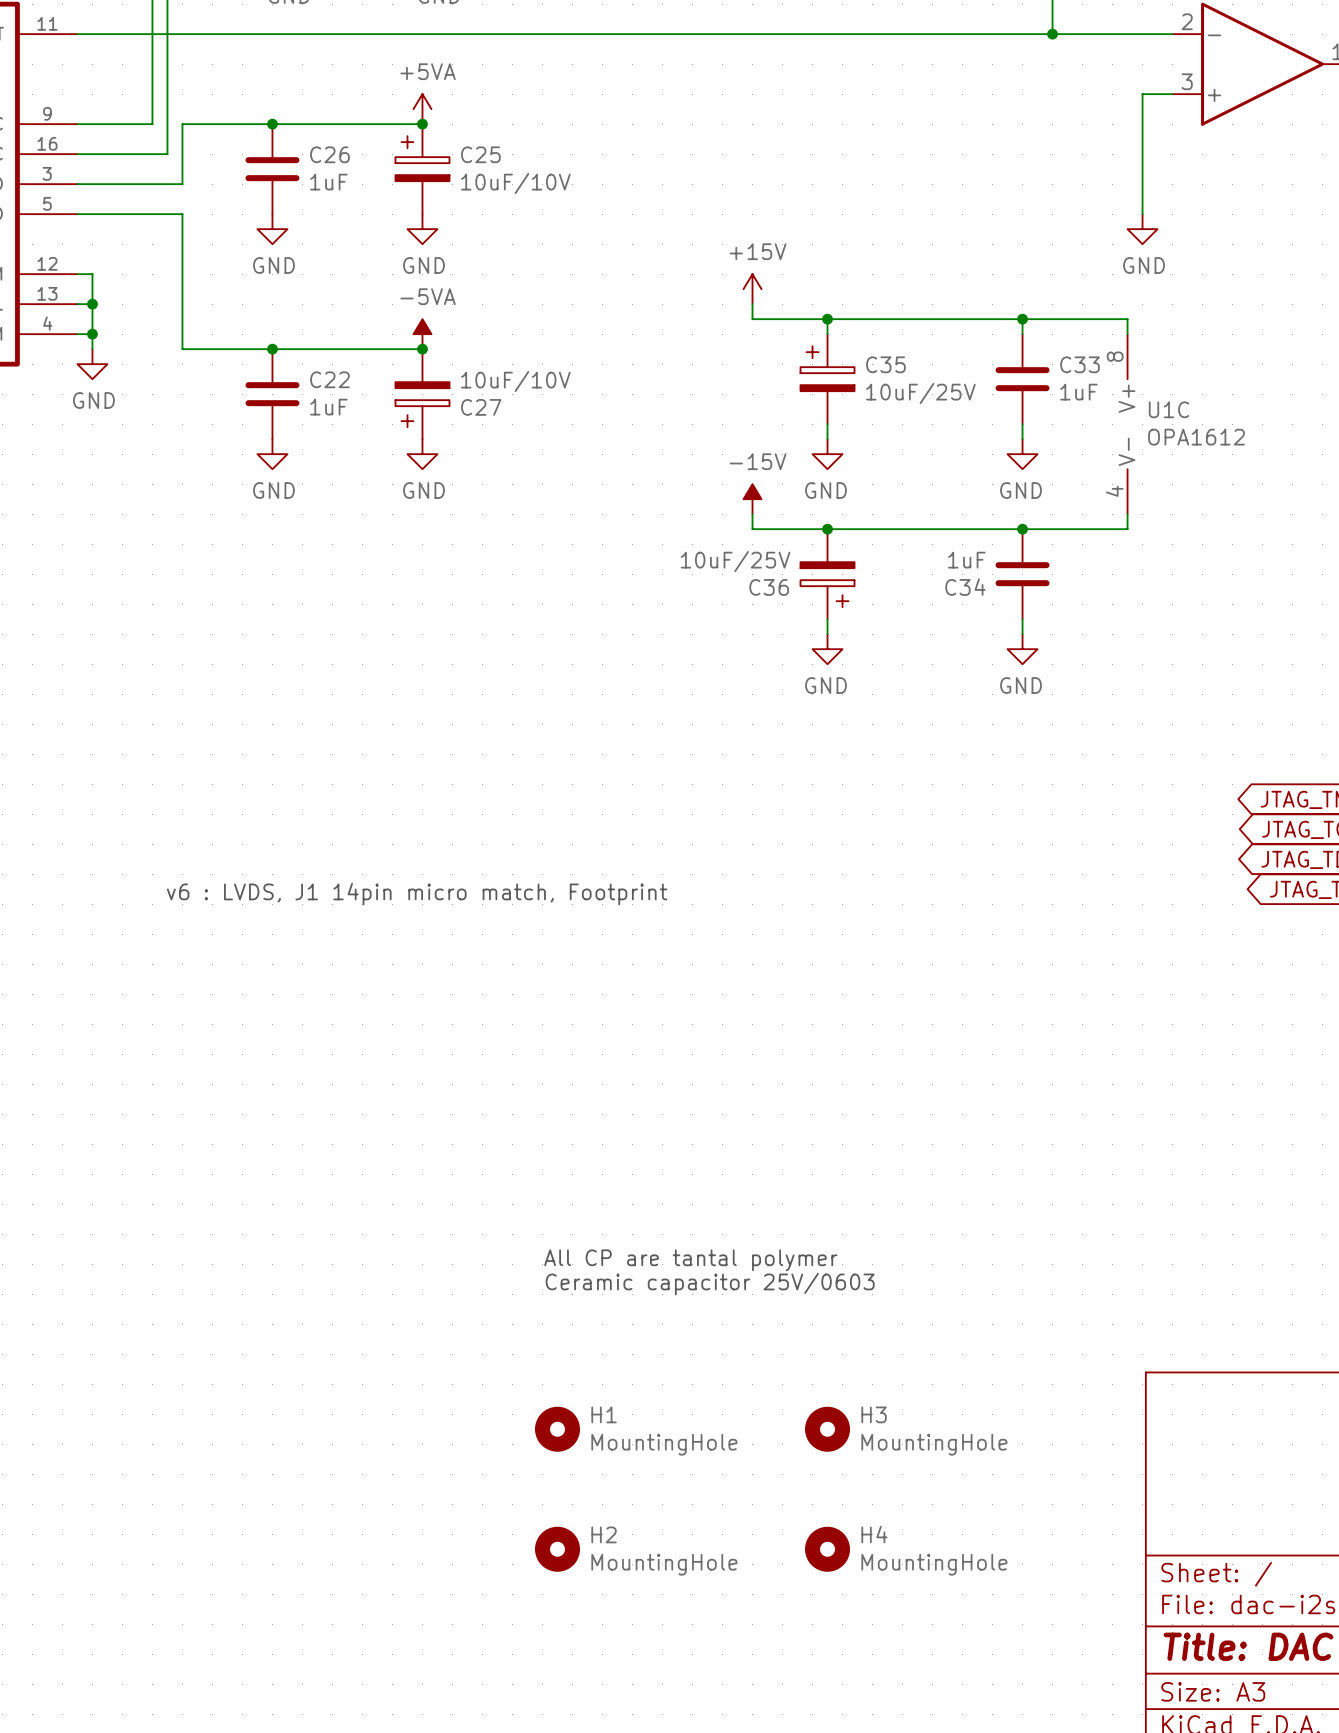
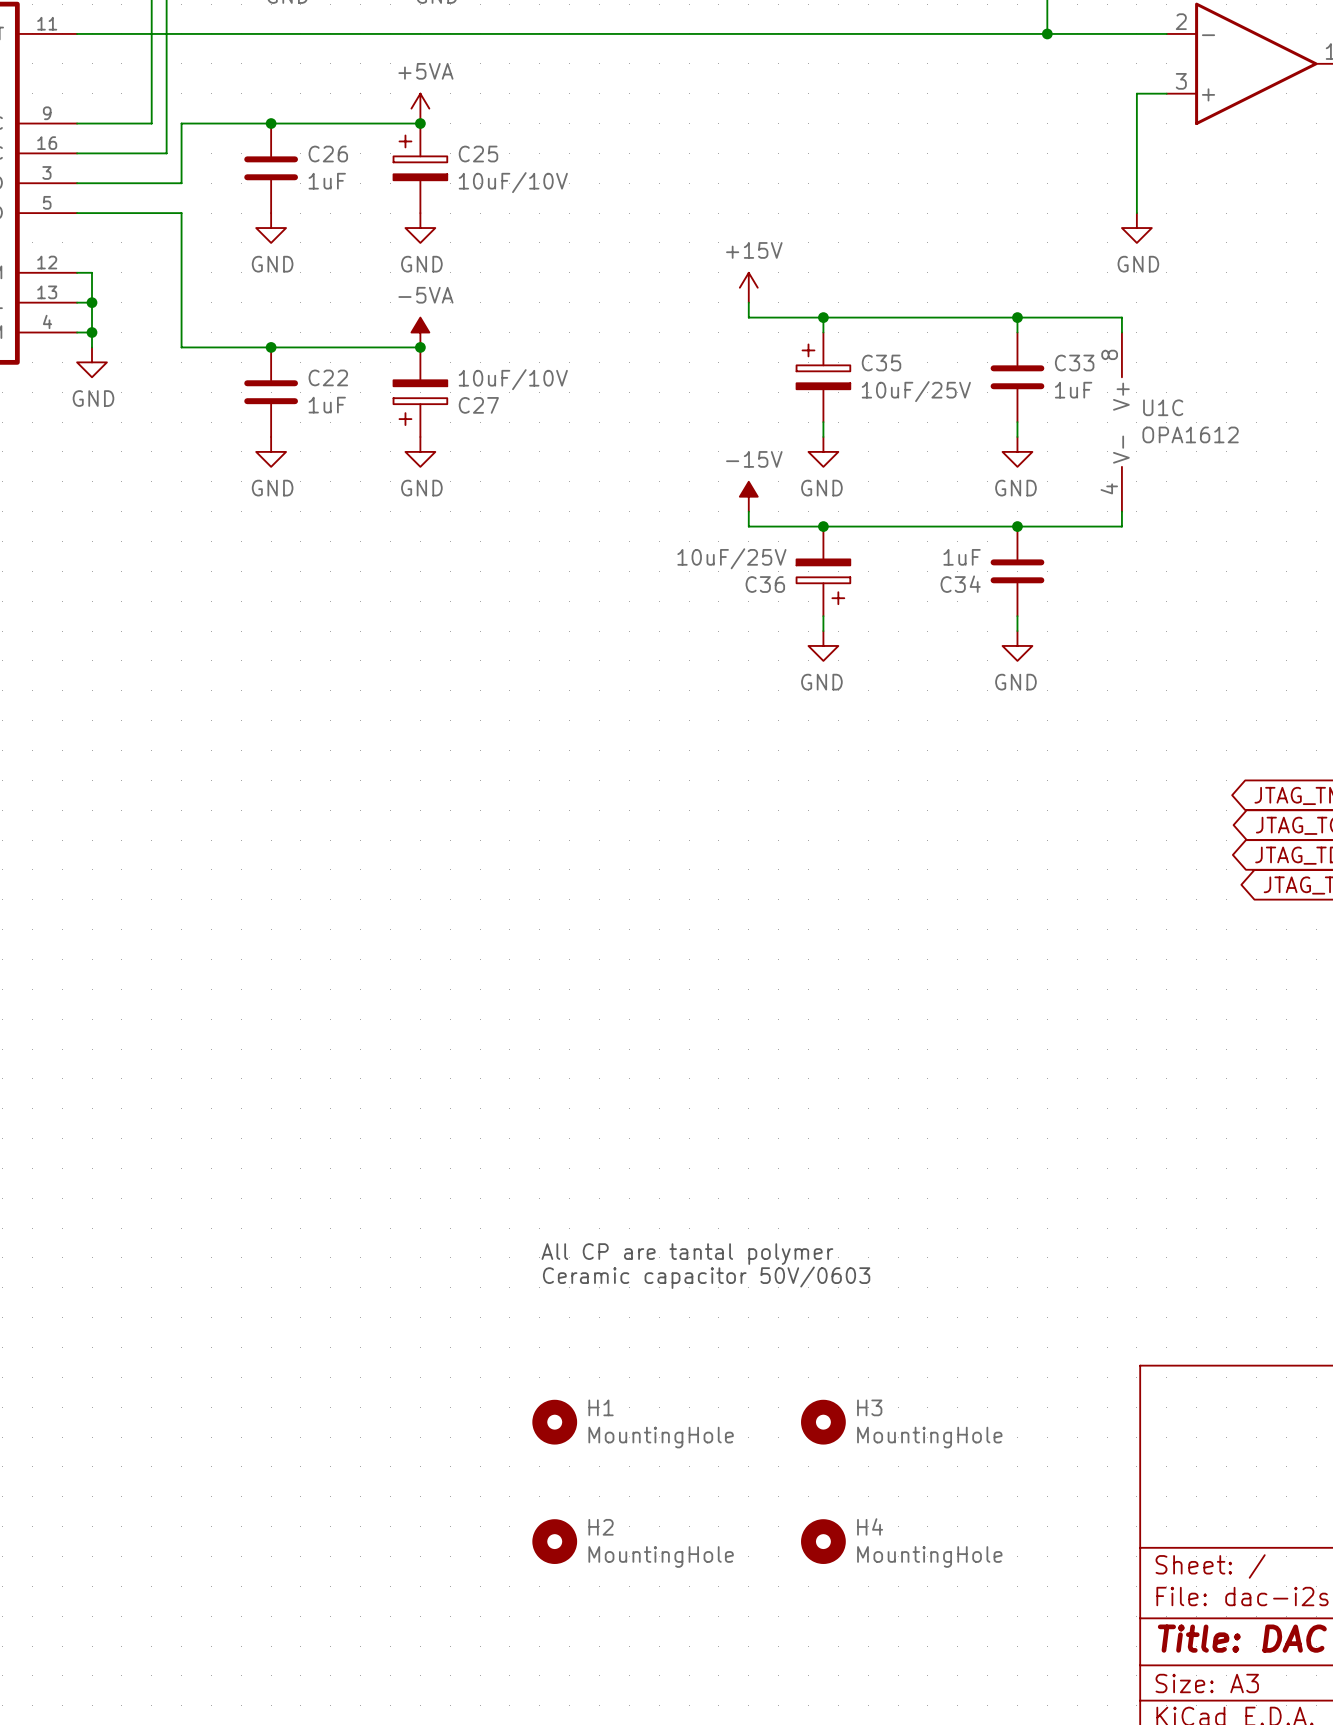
text: v6 : LVDS, J1 14pin micro match, Footprint (417, 894) -> none
text: Ceramic capacitor 25V/0603 (710, 1284) -> Ceramic capacitor 50V/0603 (706, 1277)

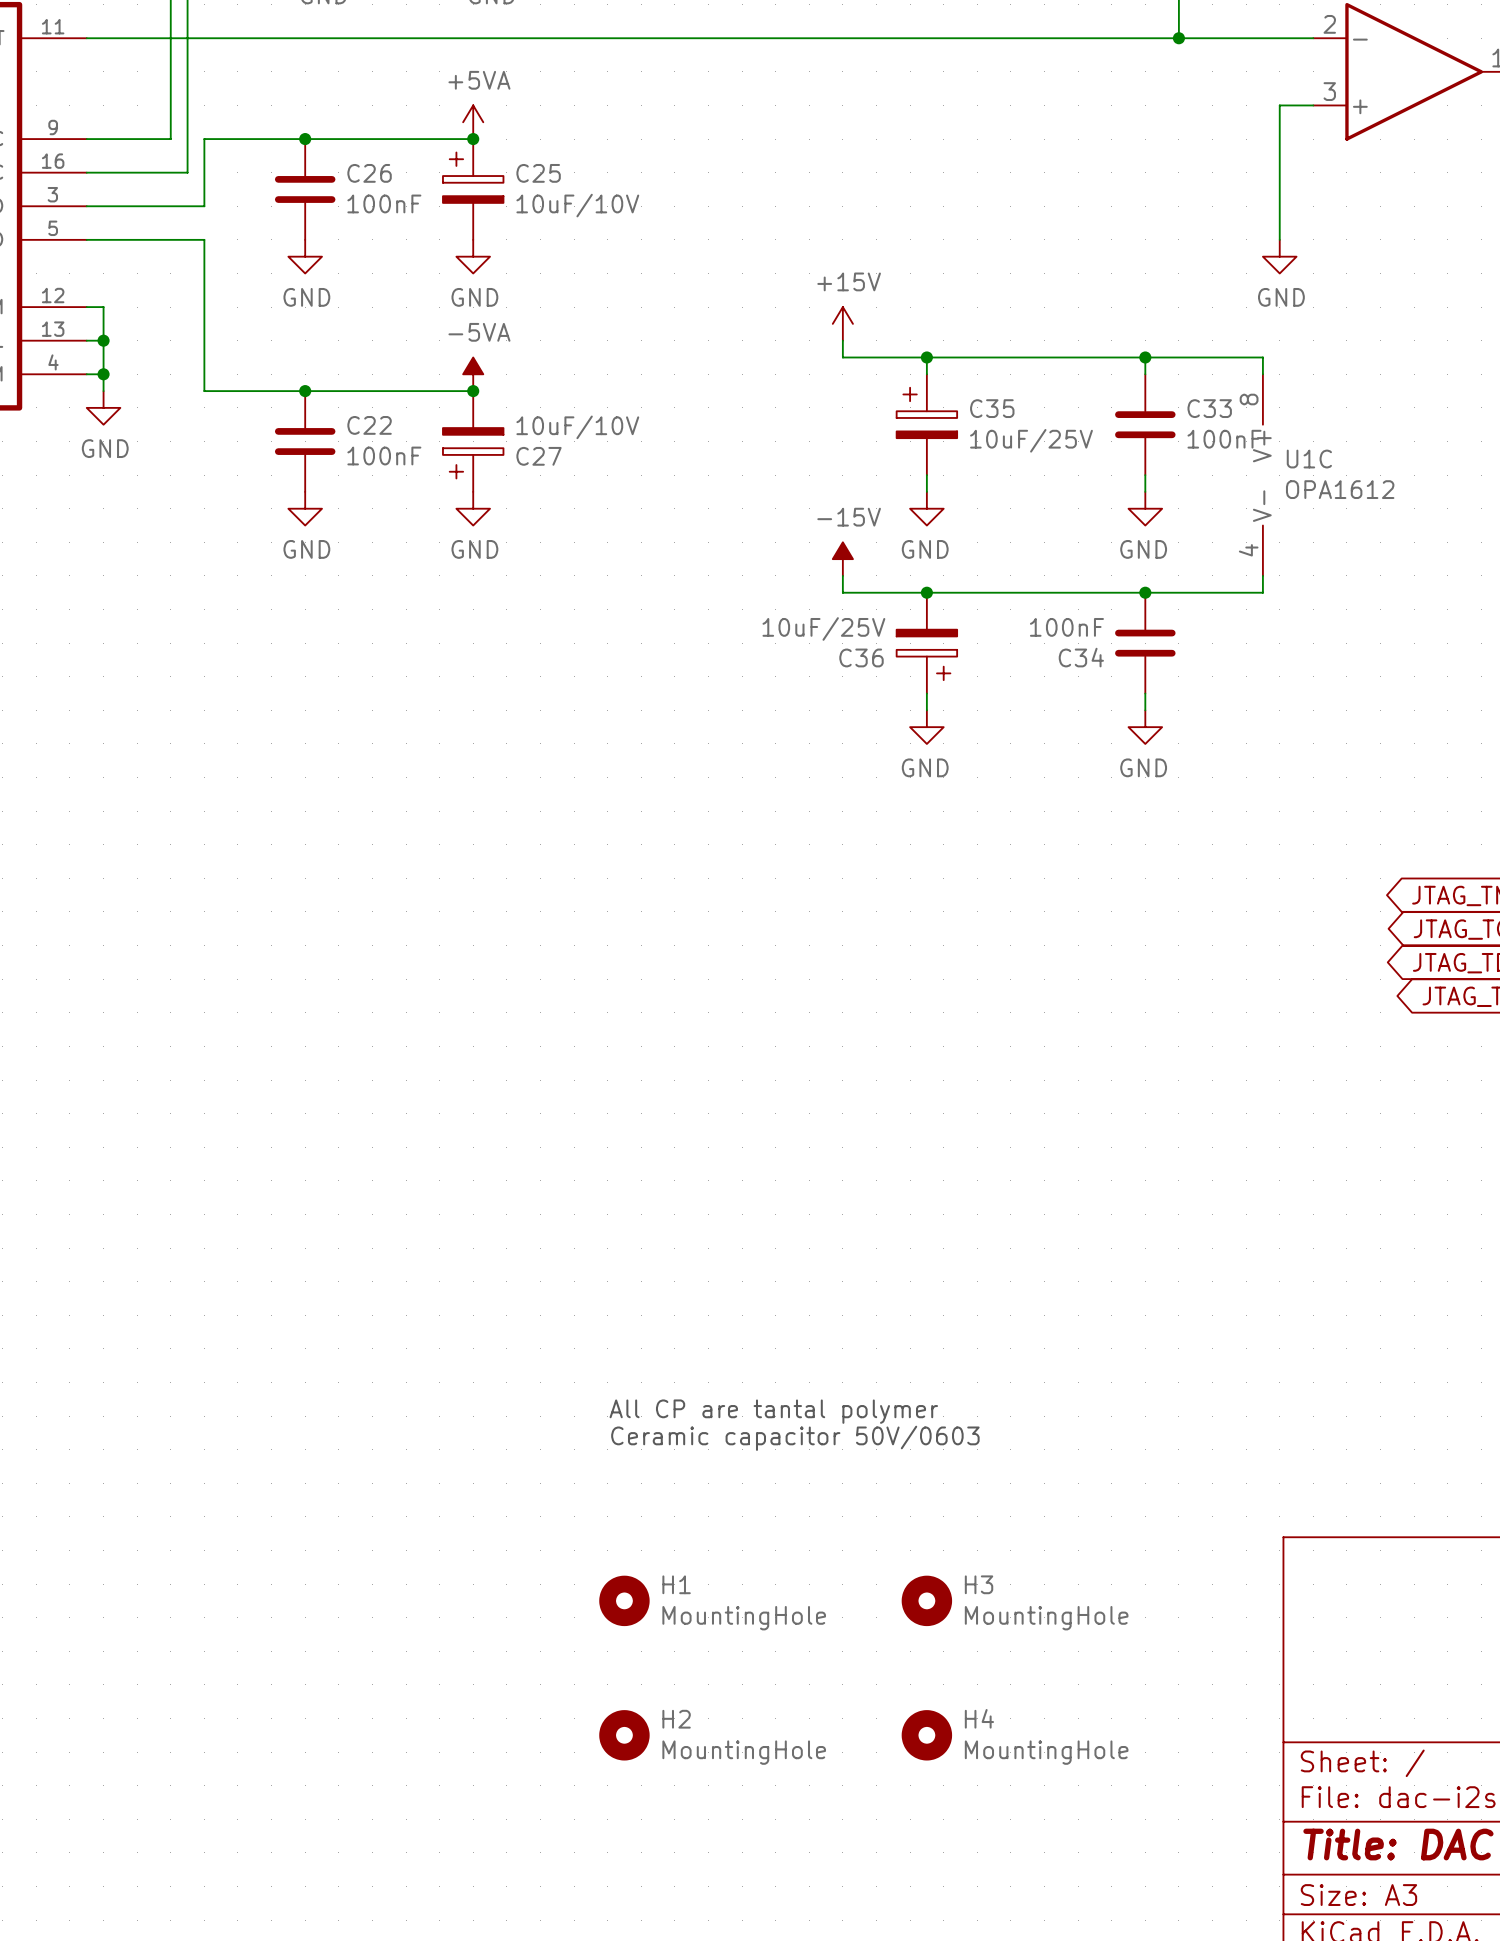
C26 value: 1uF (327, 181) -> 100nF (384, 203)
C33 value: 1uF (1073, 390) -> 100nF (1224, 439)
C22 value: 1uF (327, 405) -> 100nF (384, 456)
C34 value: 1uF (962, 557) -> 100nF (1066, 627)

